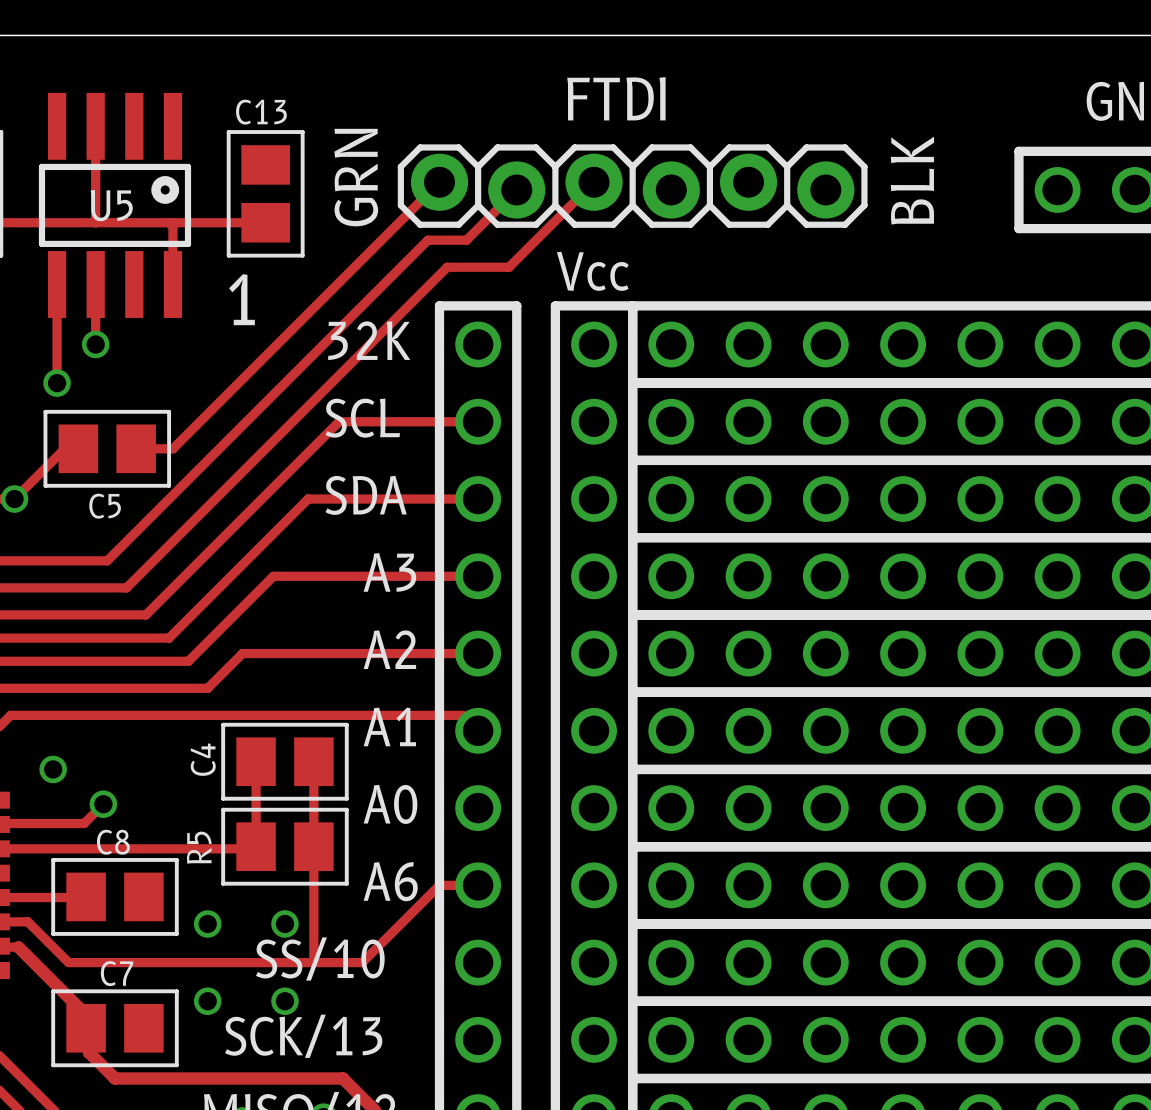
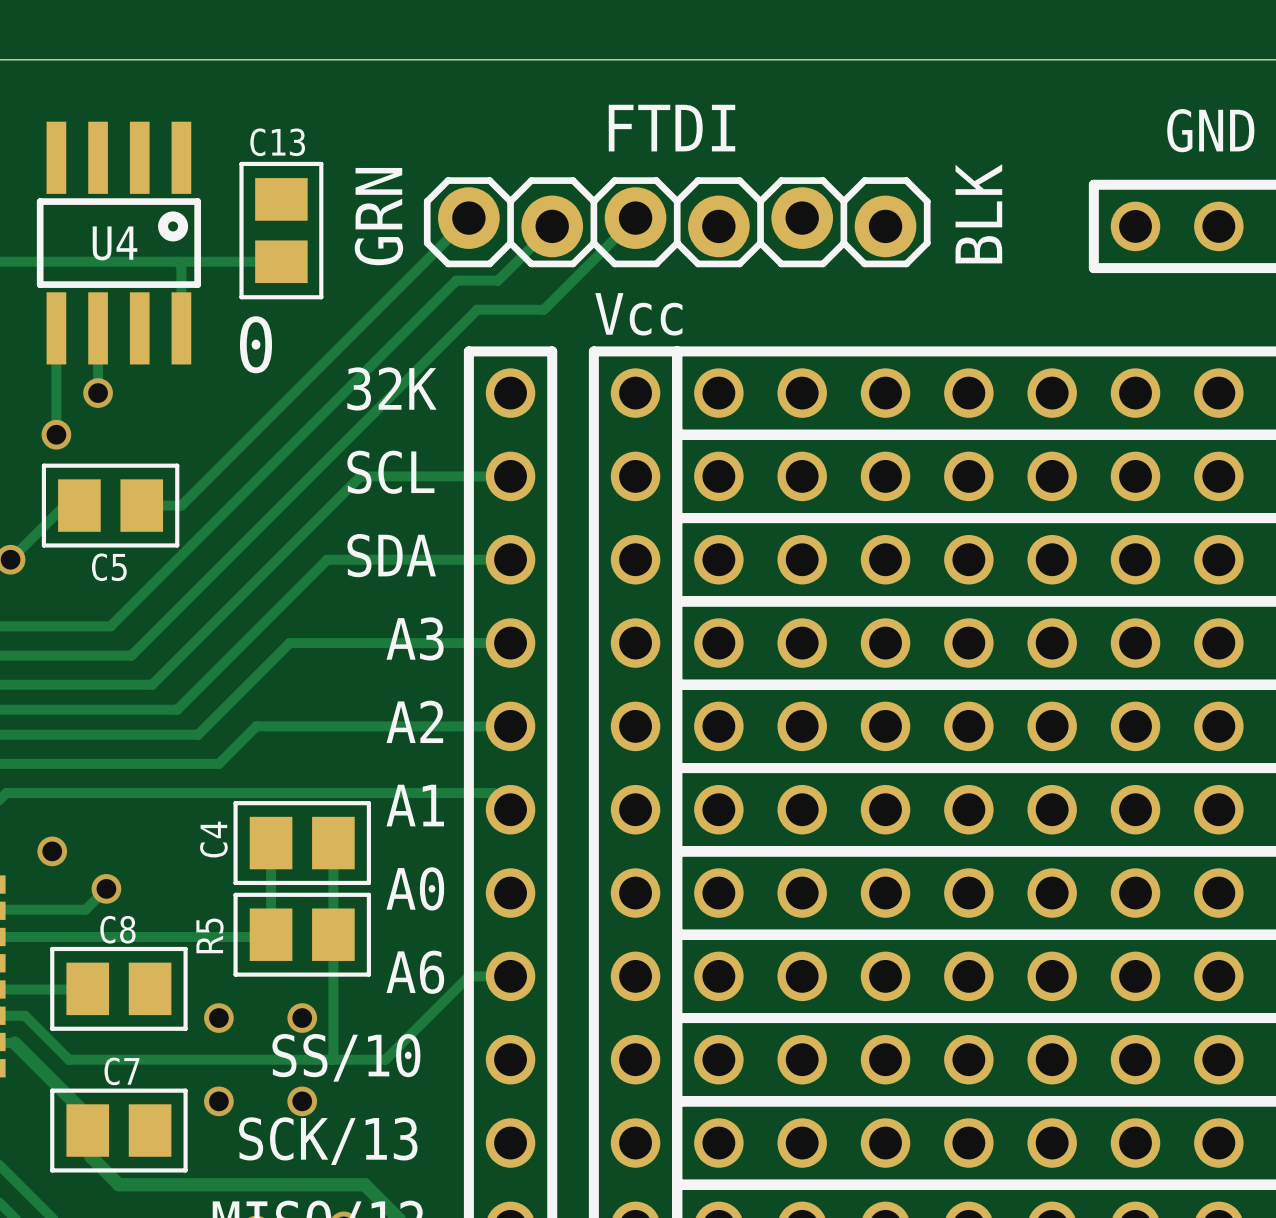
track: (95, 126) (95, 222) -> none
U5 name: U5 (111, 205) -> U4 (115, 243)
text: 1 (241, 299) -> 0 (256, 344)

